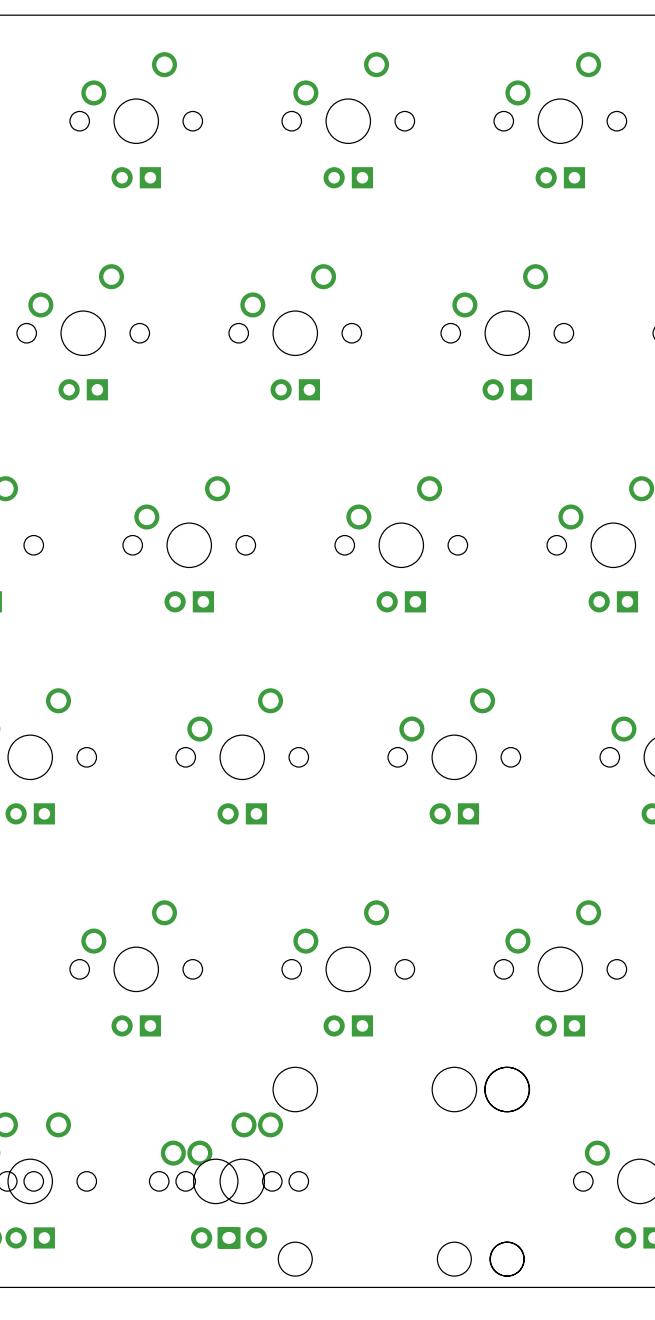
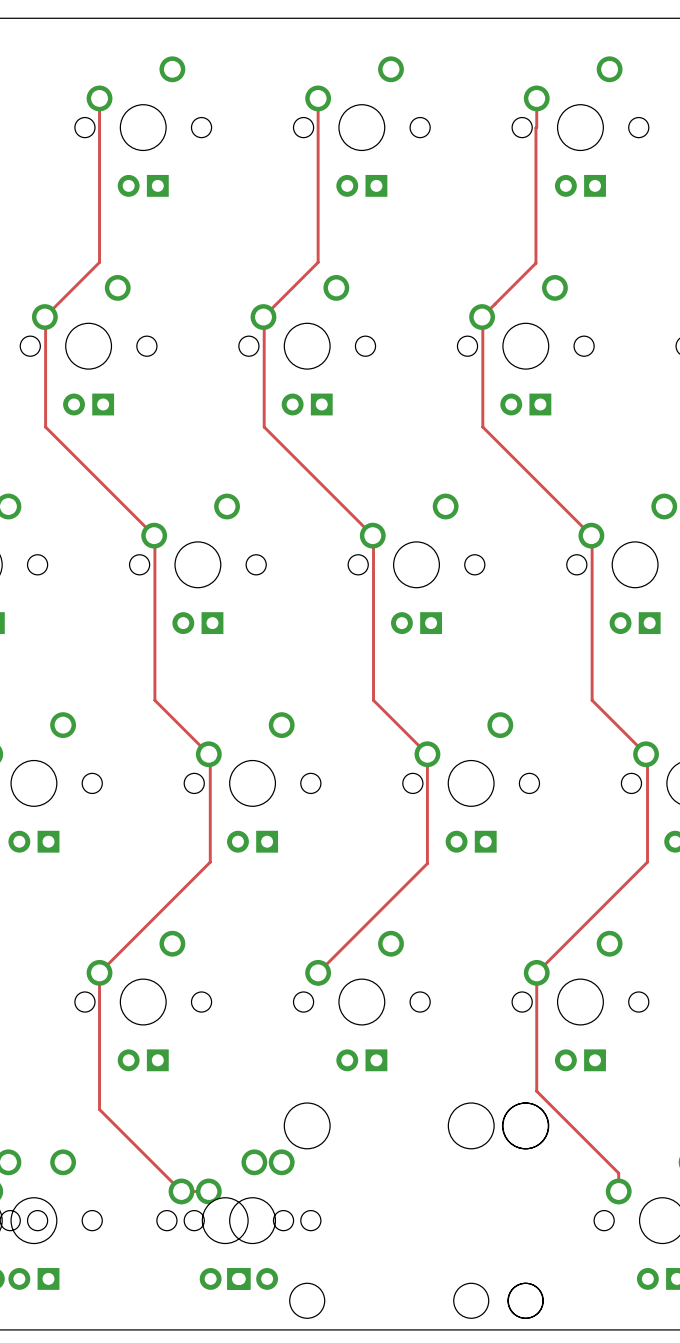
track: none -> (99, 98) (99, 262) (44, 317) (45, 427) (154, 535) (154, 700) (208, 754) (210, 765) (210, 862) (99, 972) (99, 1109) (181, 1191) (208, 1191)
track: none -> (318, 98) (318, 262) (263, 317) (264, 427) (372, 535) (373, 700) (427, 754) (427, 863) (318, 972) (318, 984)
track: none -> (536, 98) (535, 263) (482, 317) (482, 427) (591, 535) (592, 700) (646, 754) (647, 862) (536, 972) (536, 1091) (618, 1173) (618, 1191)

